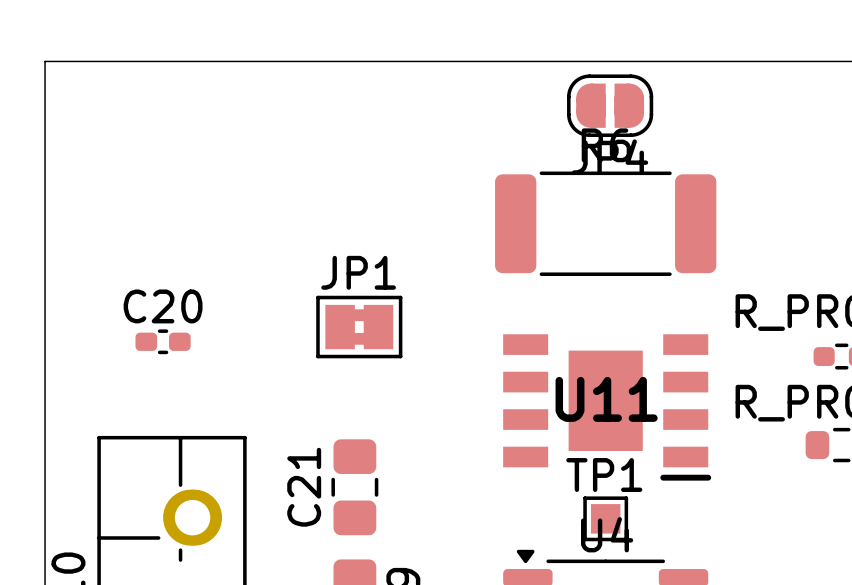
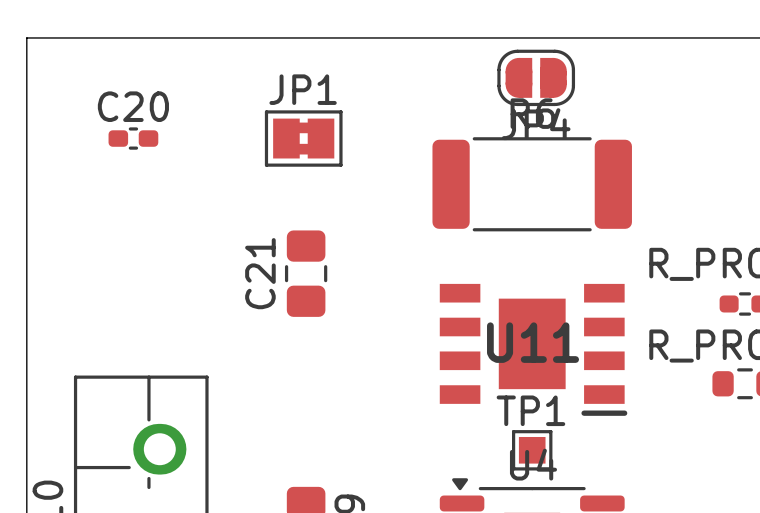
JP1 position: (359, 327) -> (303, 138)
C20 position: (163, 341) -> (133, 138)
C21 position: (354, 487) -> (306, 273)

